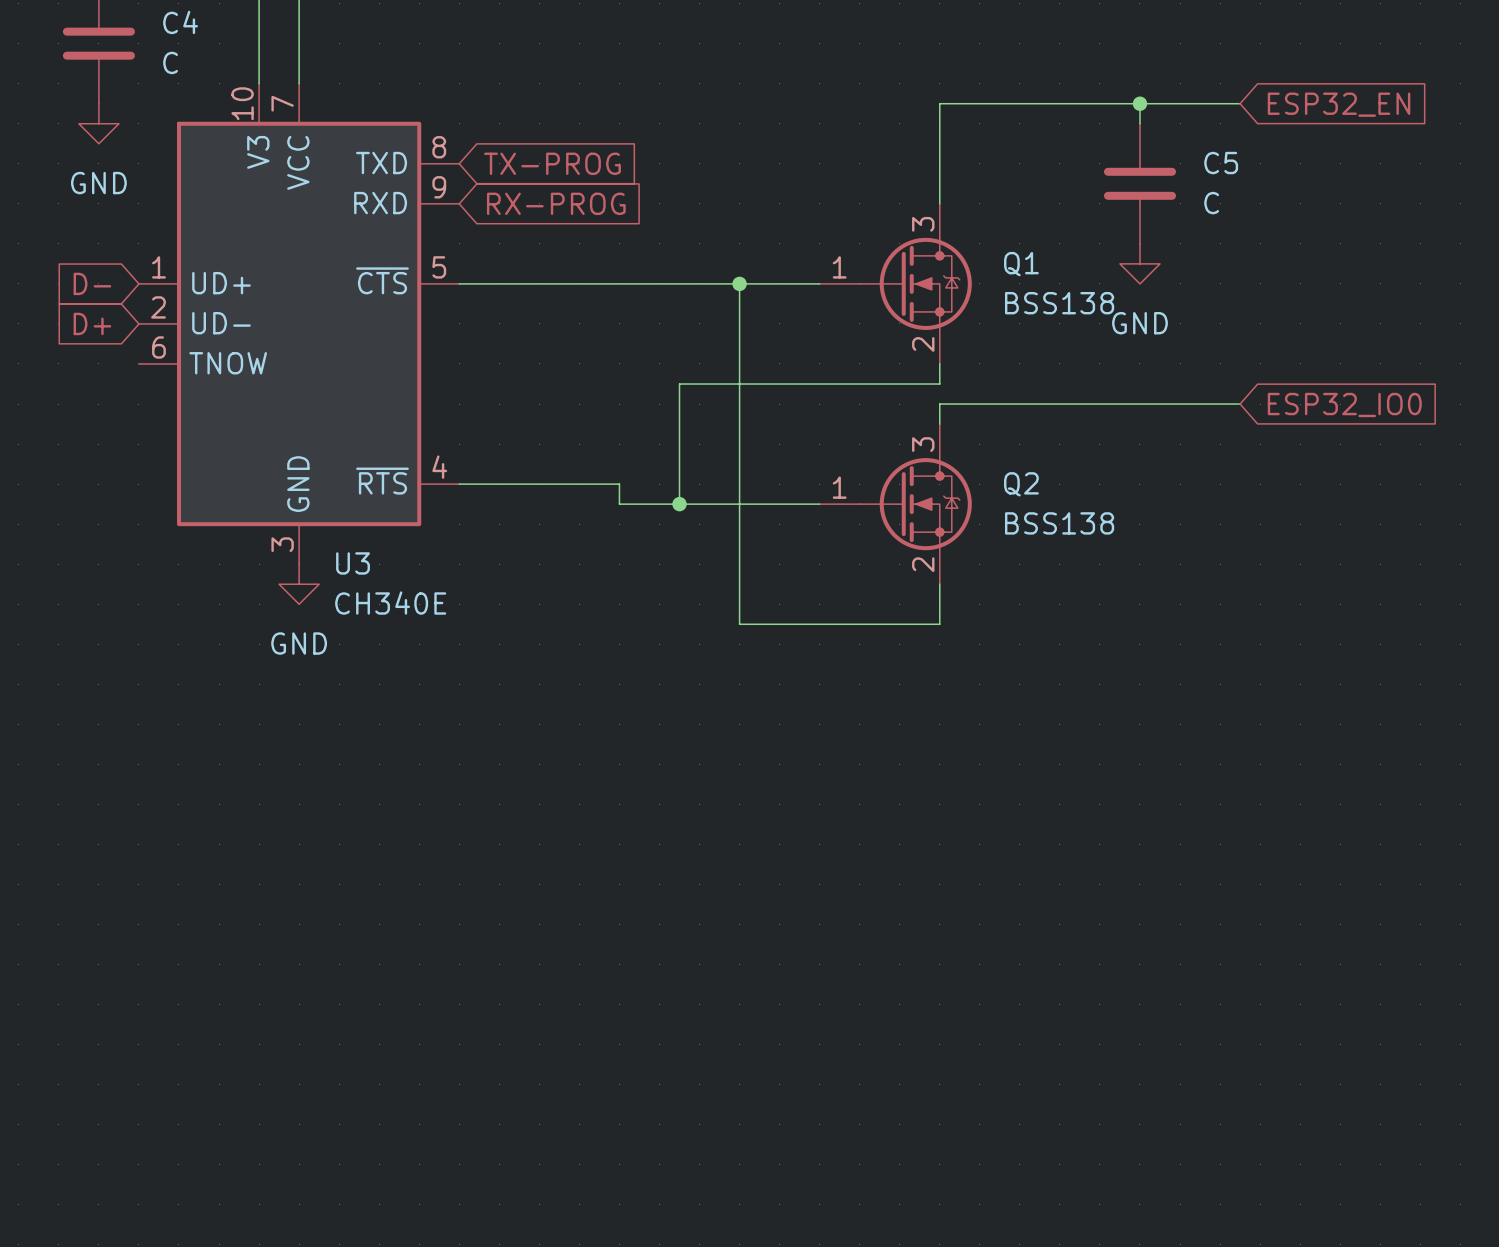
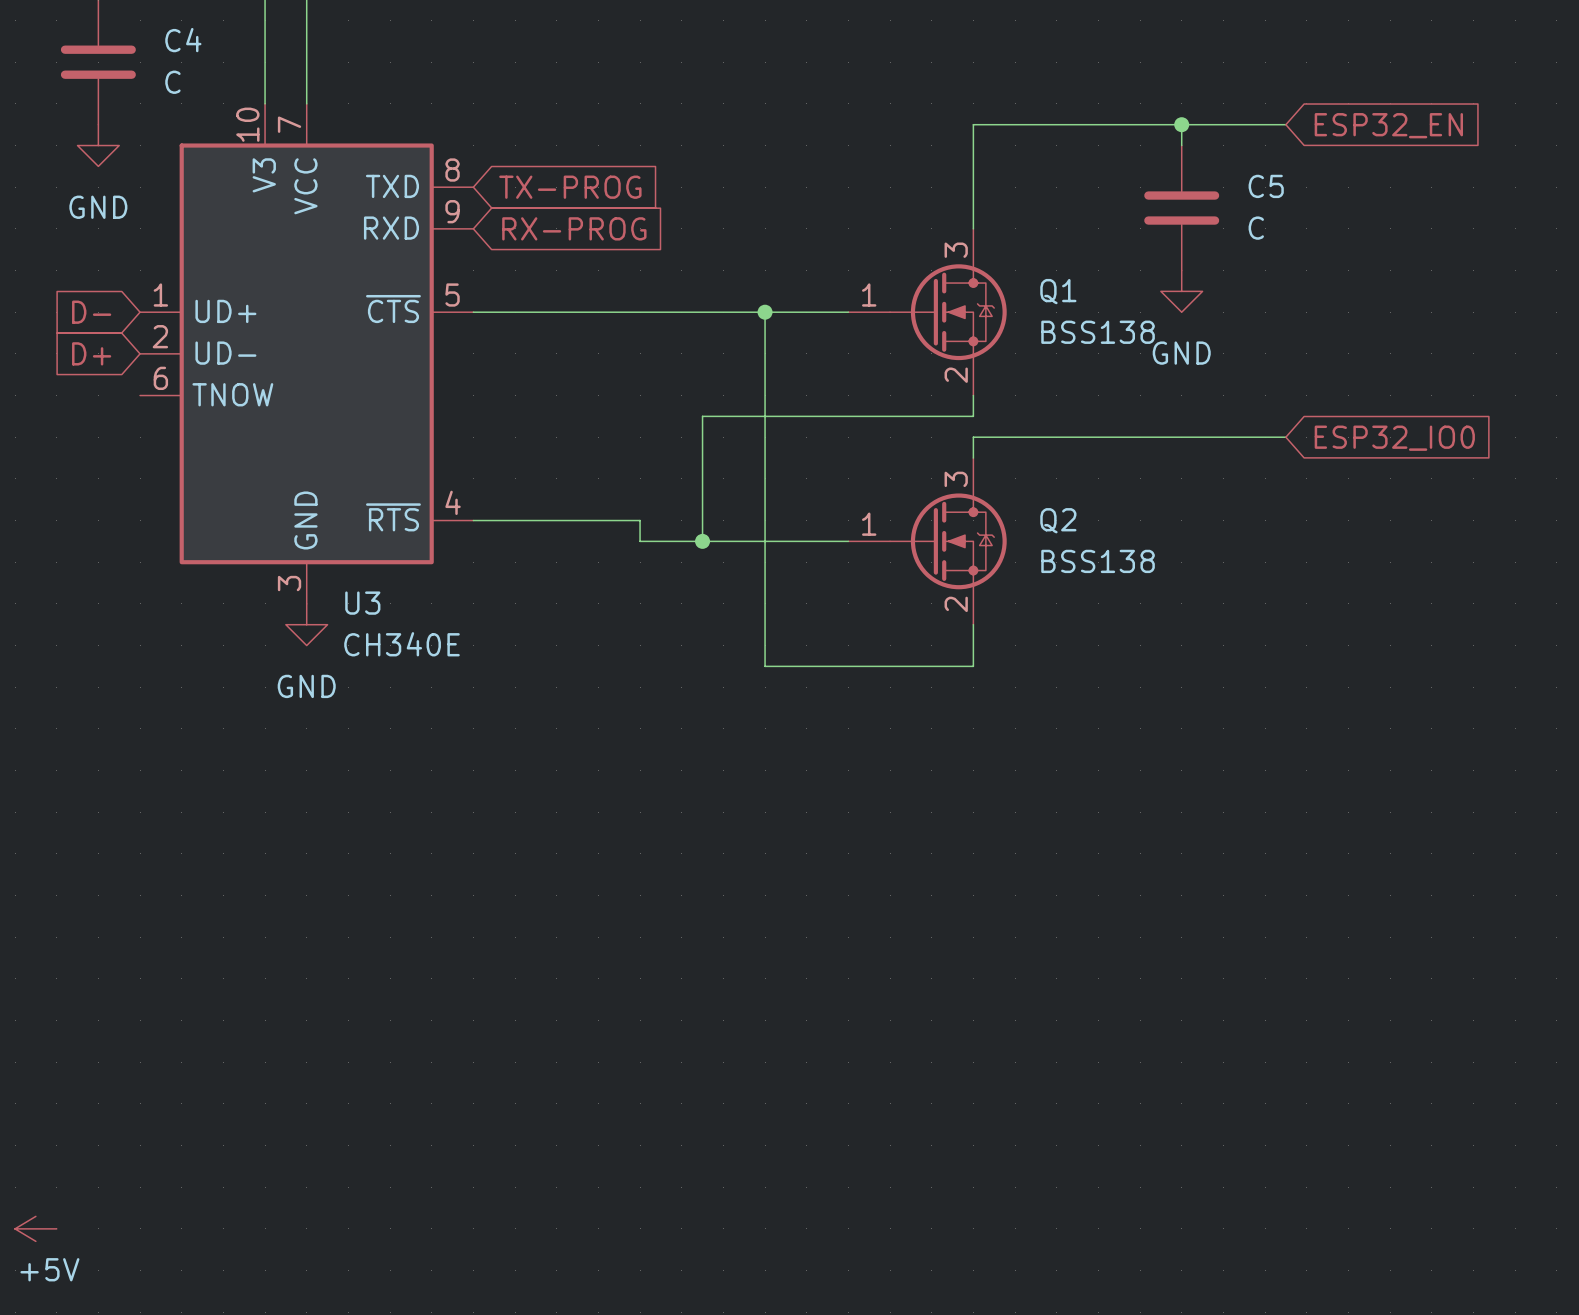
power symbol: none -> +5V (35, 1228)

